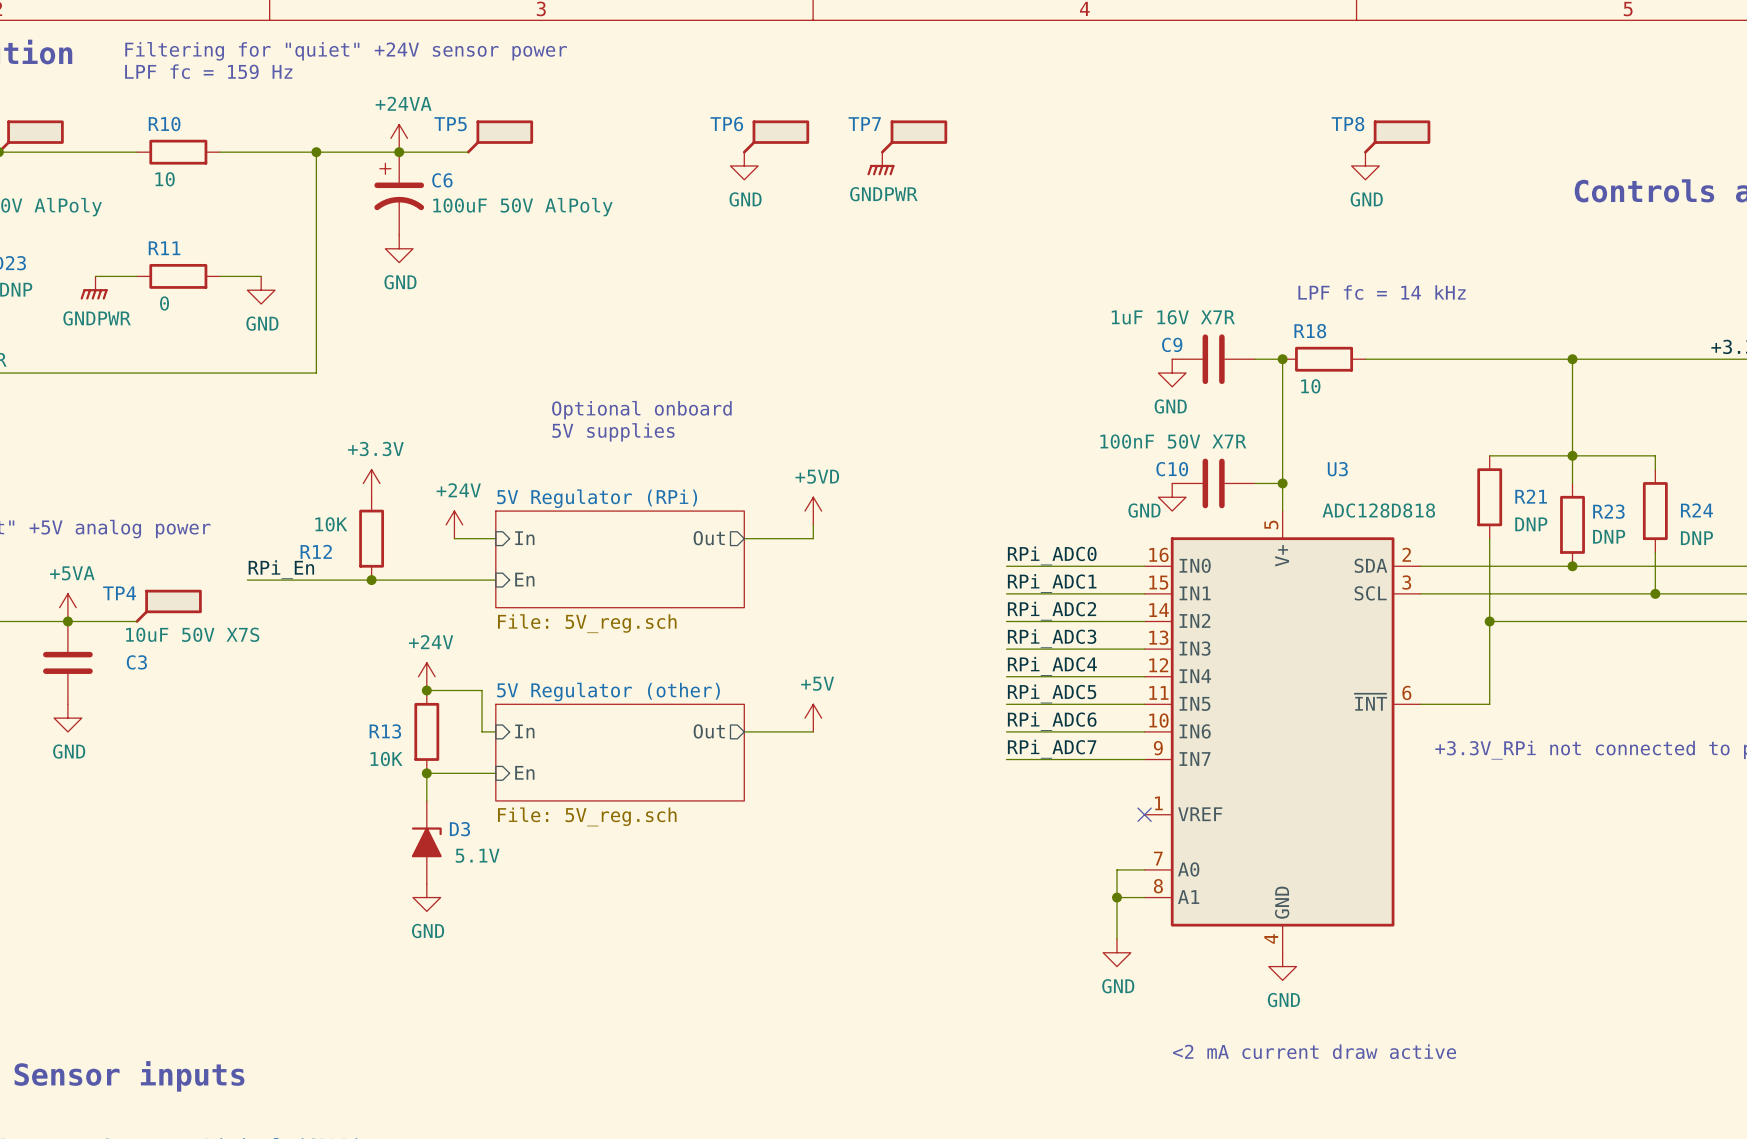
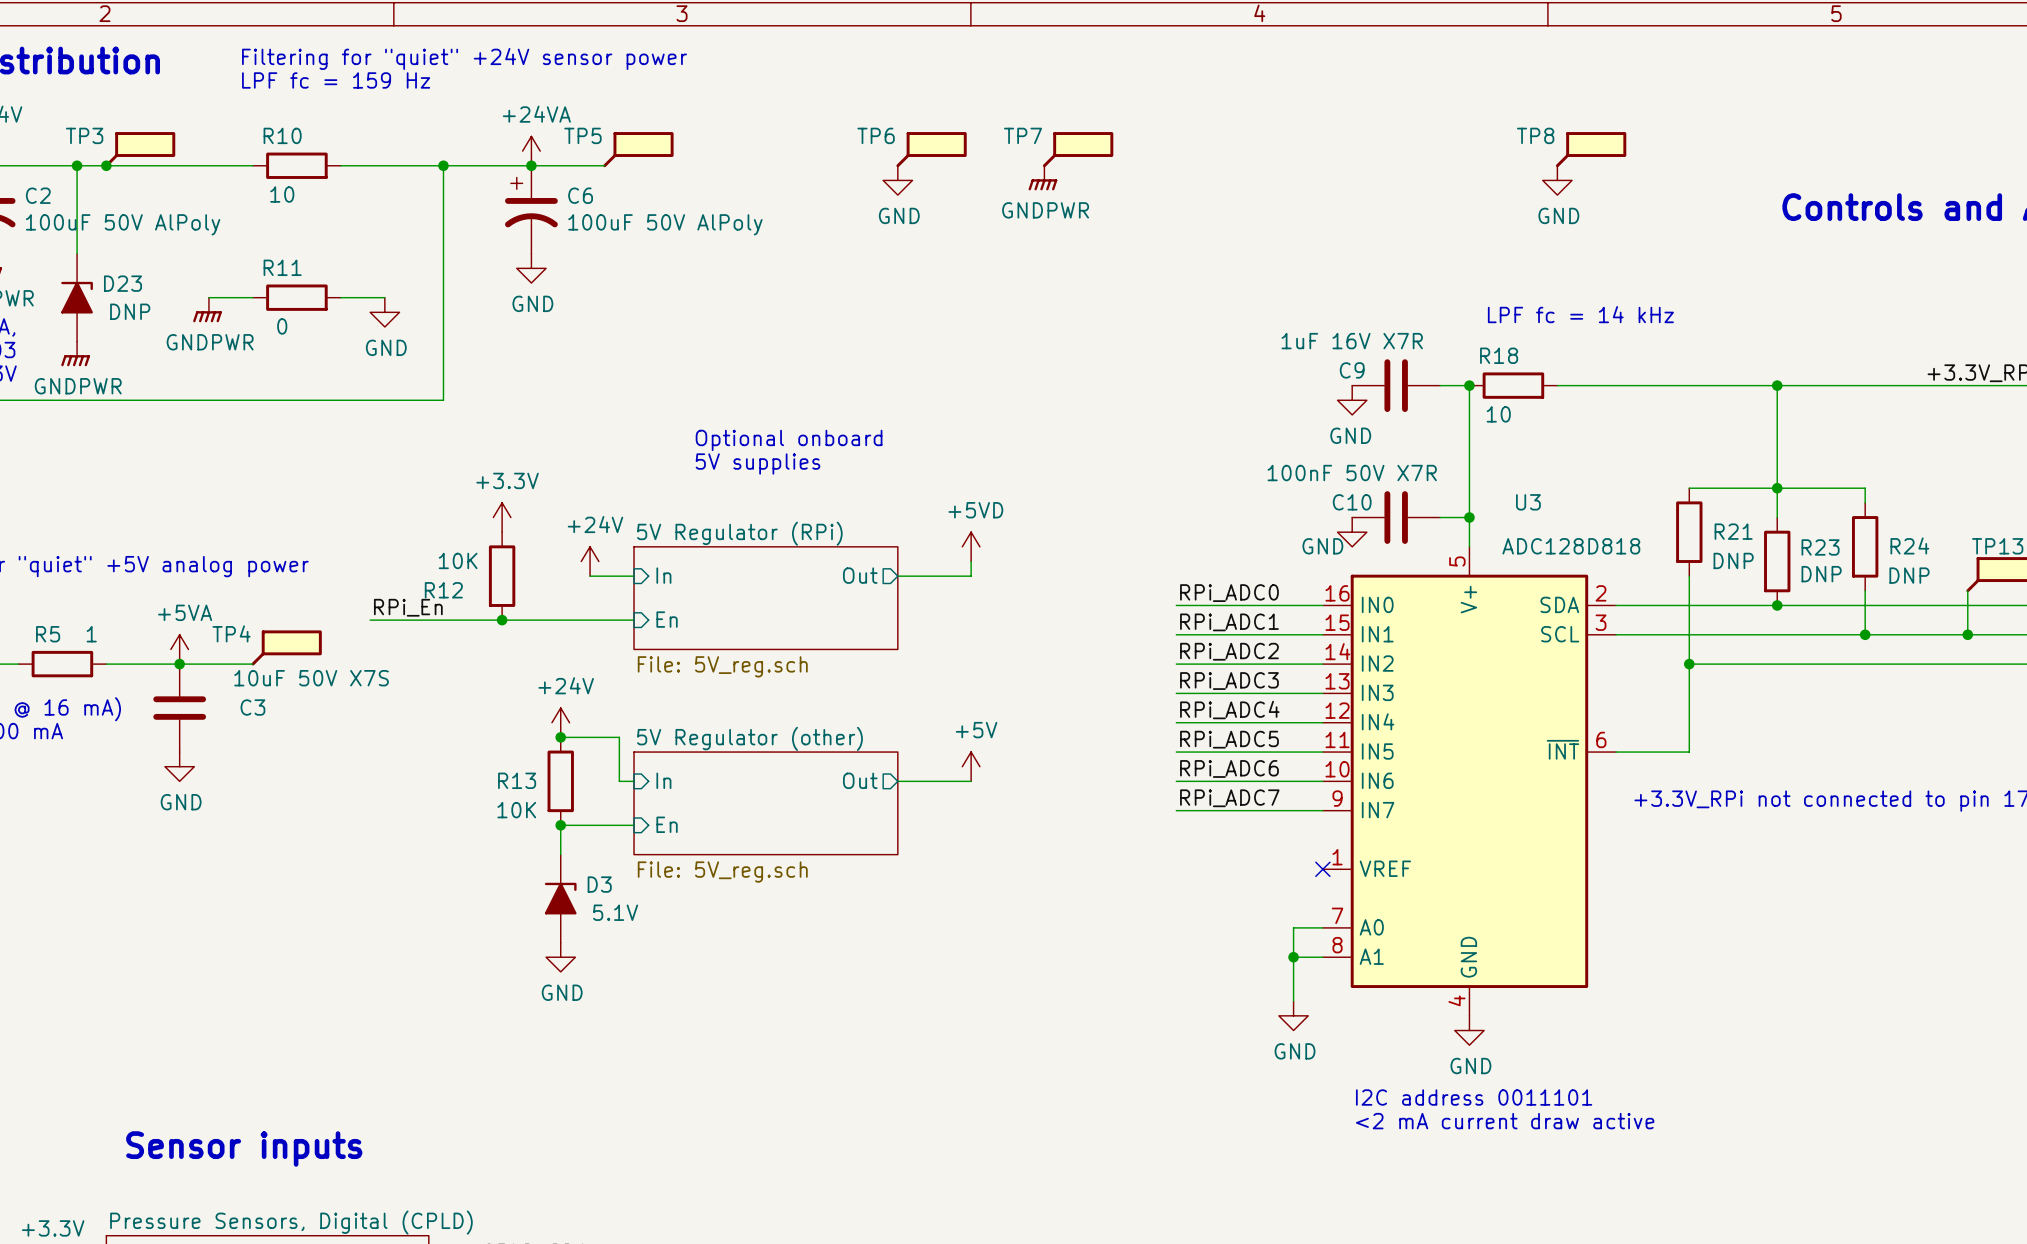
text: none -> I2C address 0011101 (1474, 1097)

